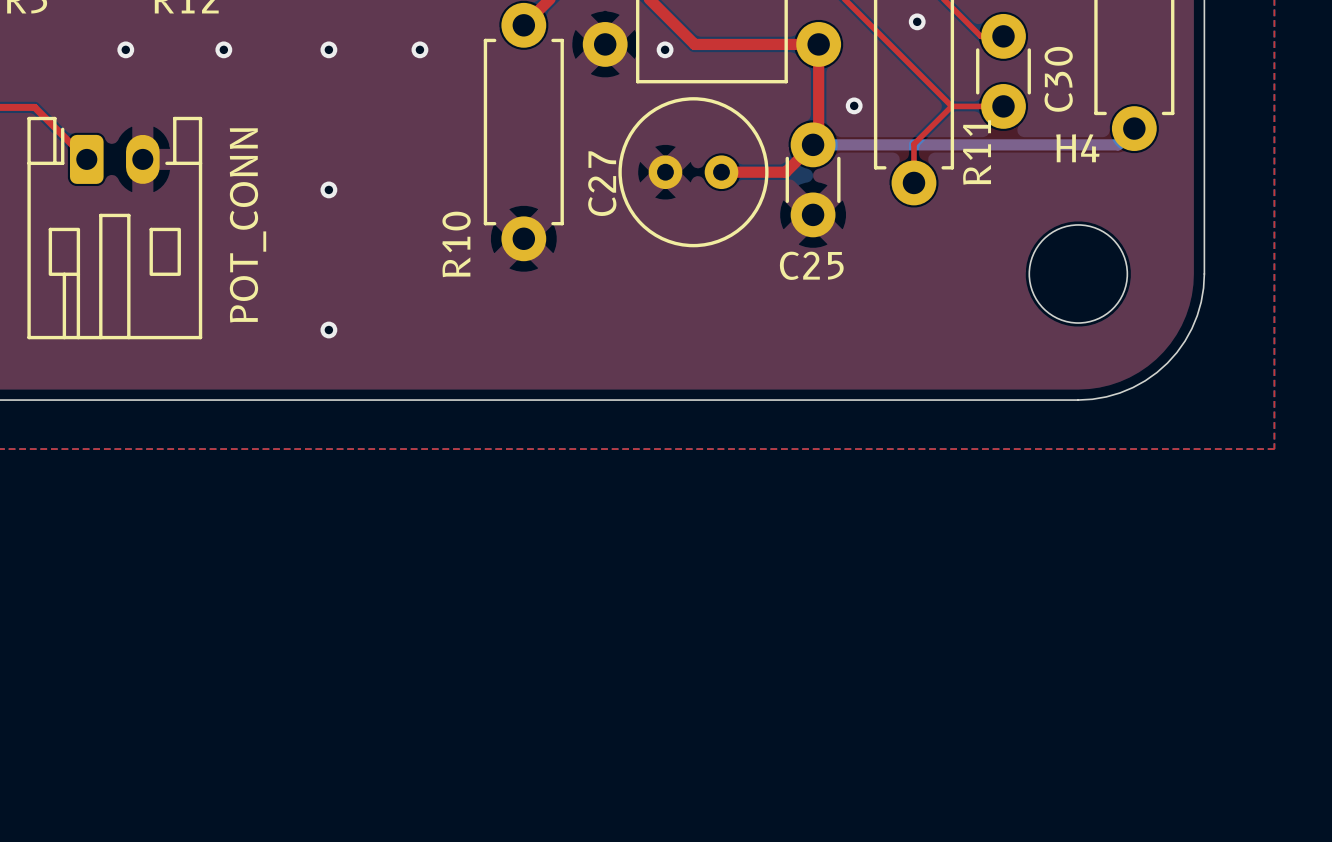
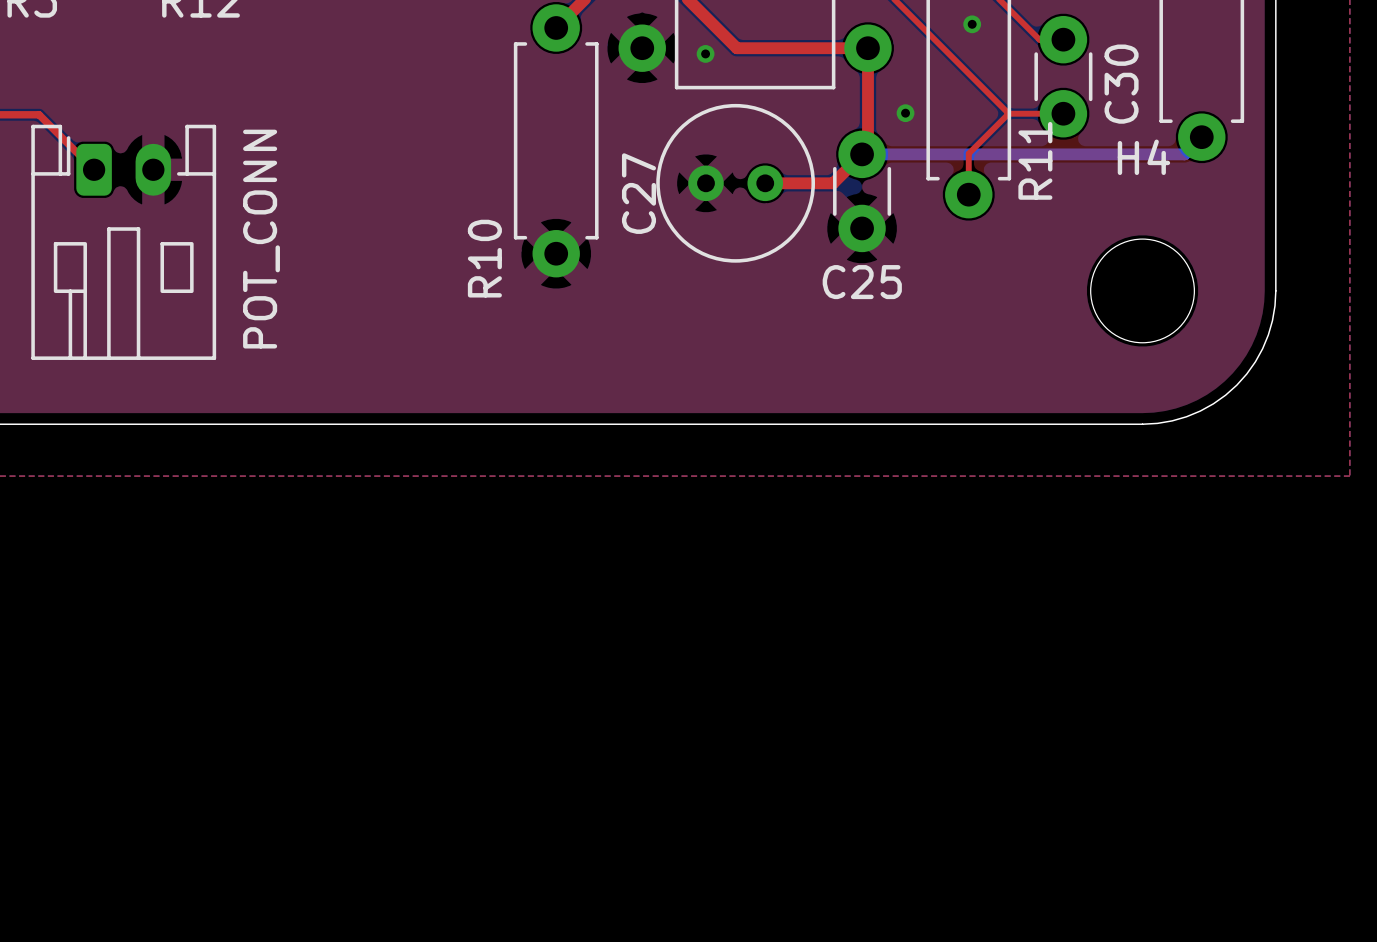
via: (125, 49) -> none
via: (223, 49) -> none
via: (328, 49) -> none
via: (419, 49) -> none
via: (328, 189) -> none
via: (328, 330) -> none

